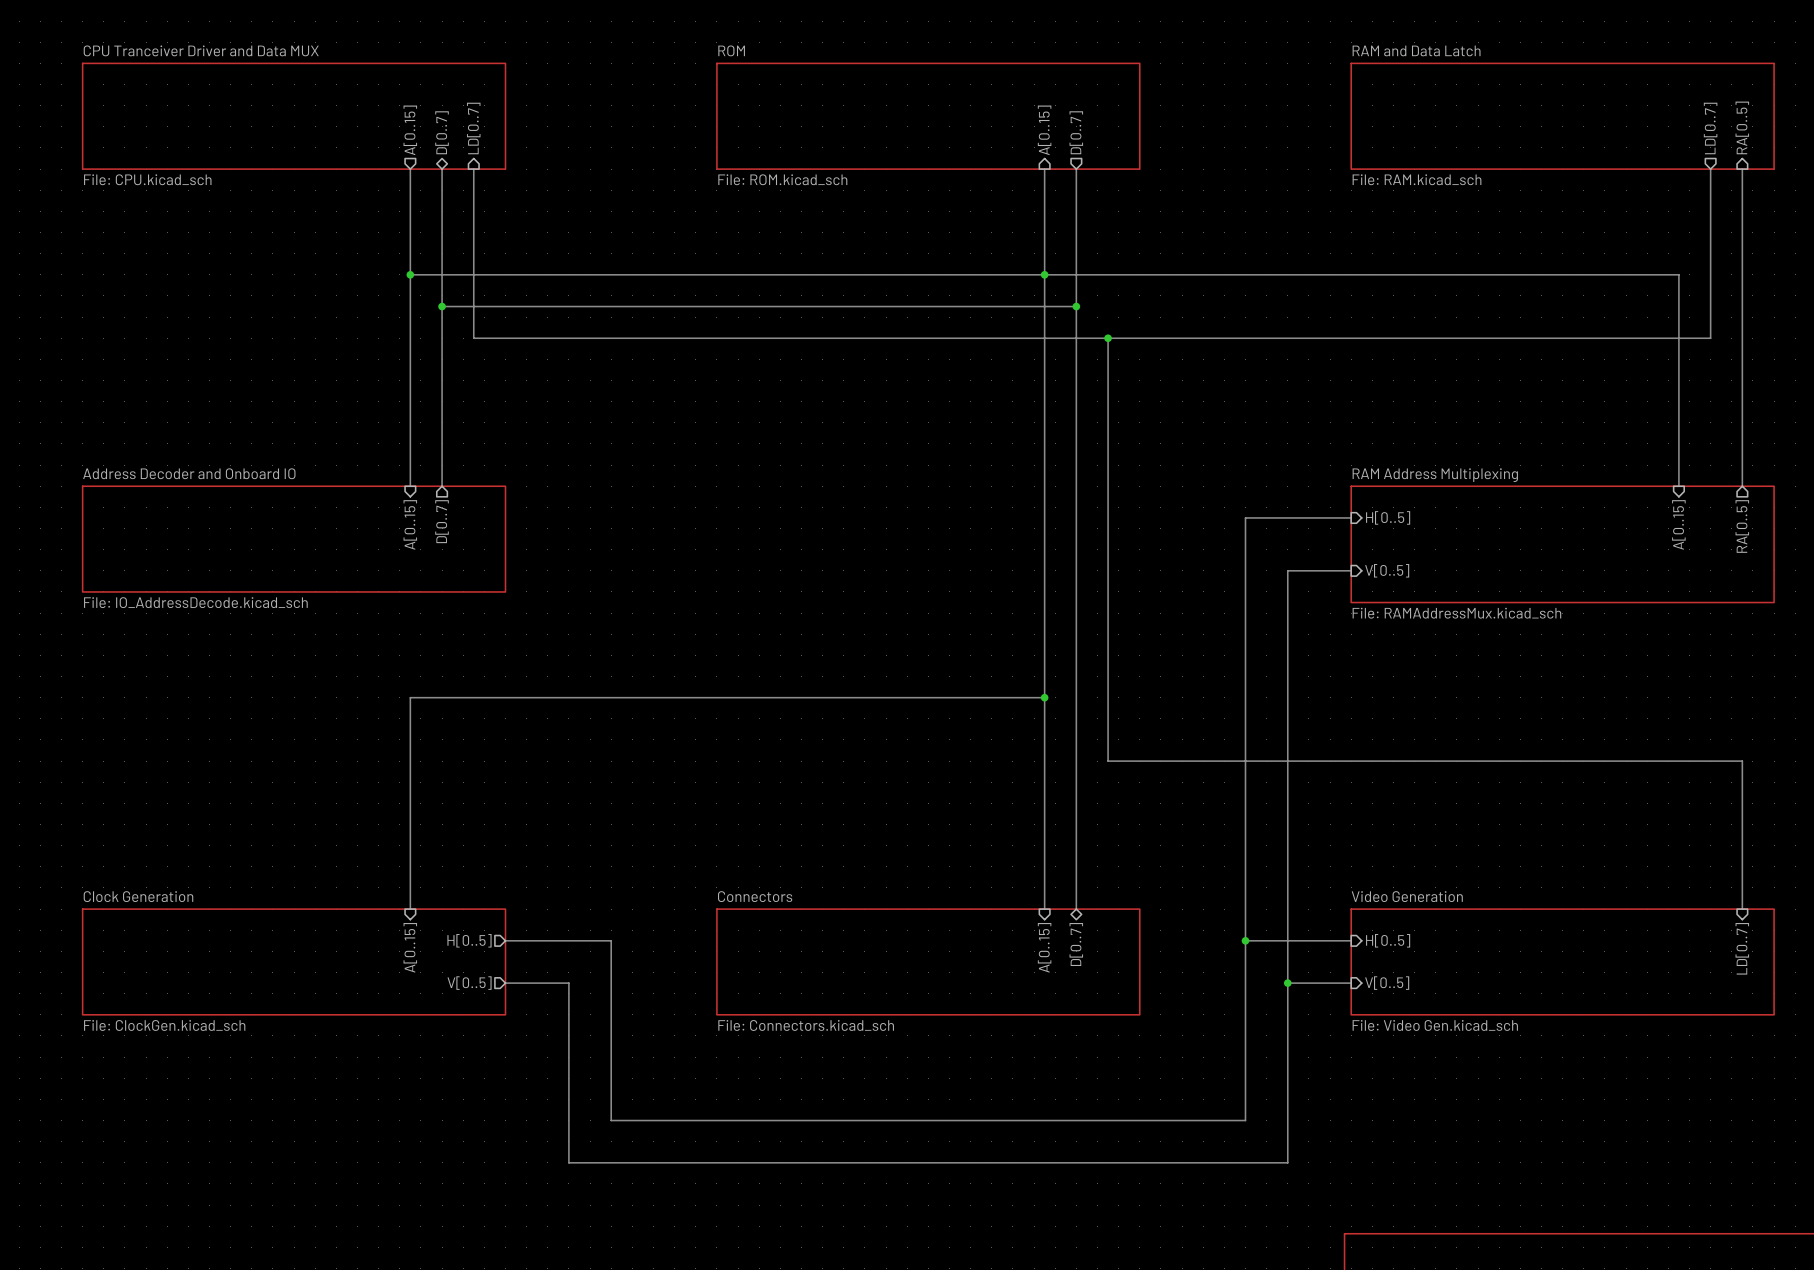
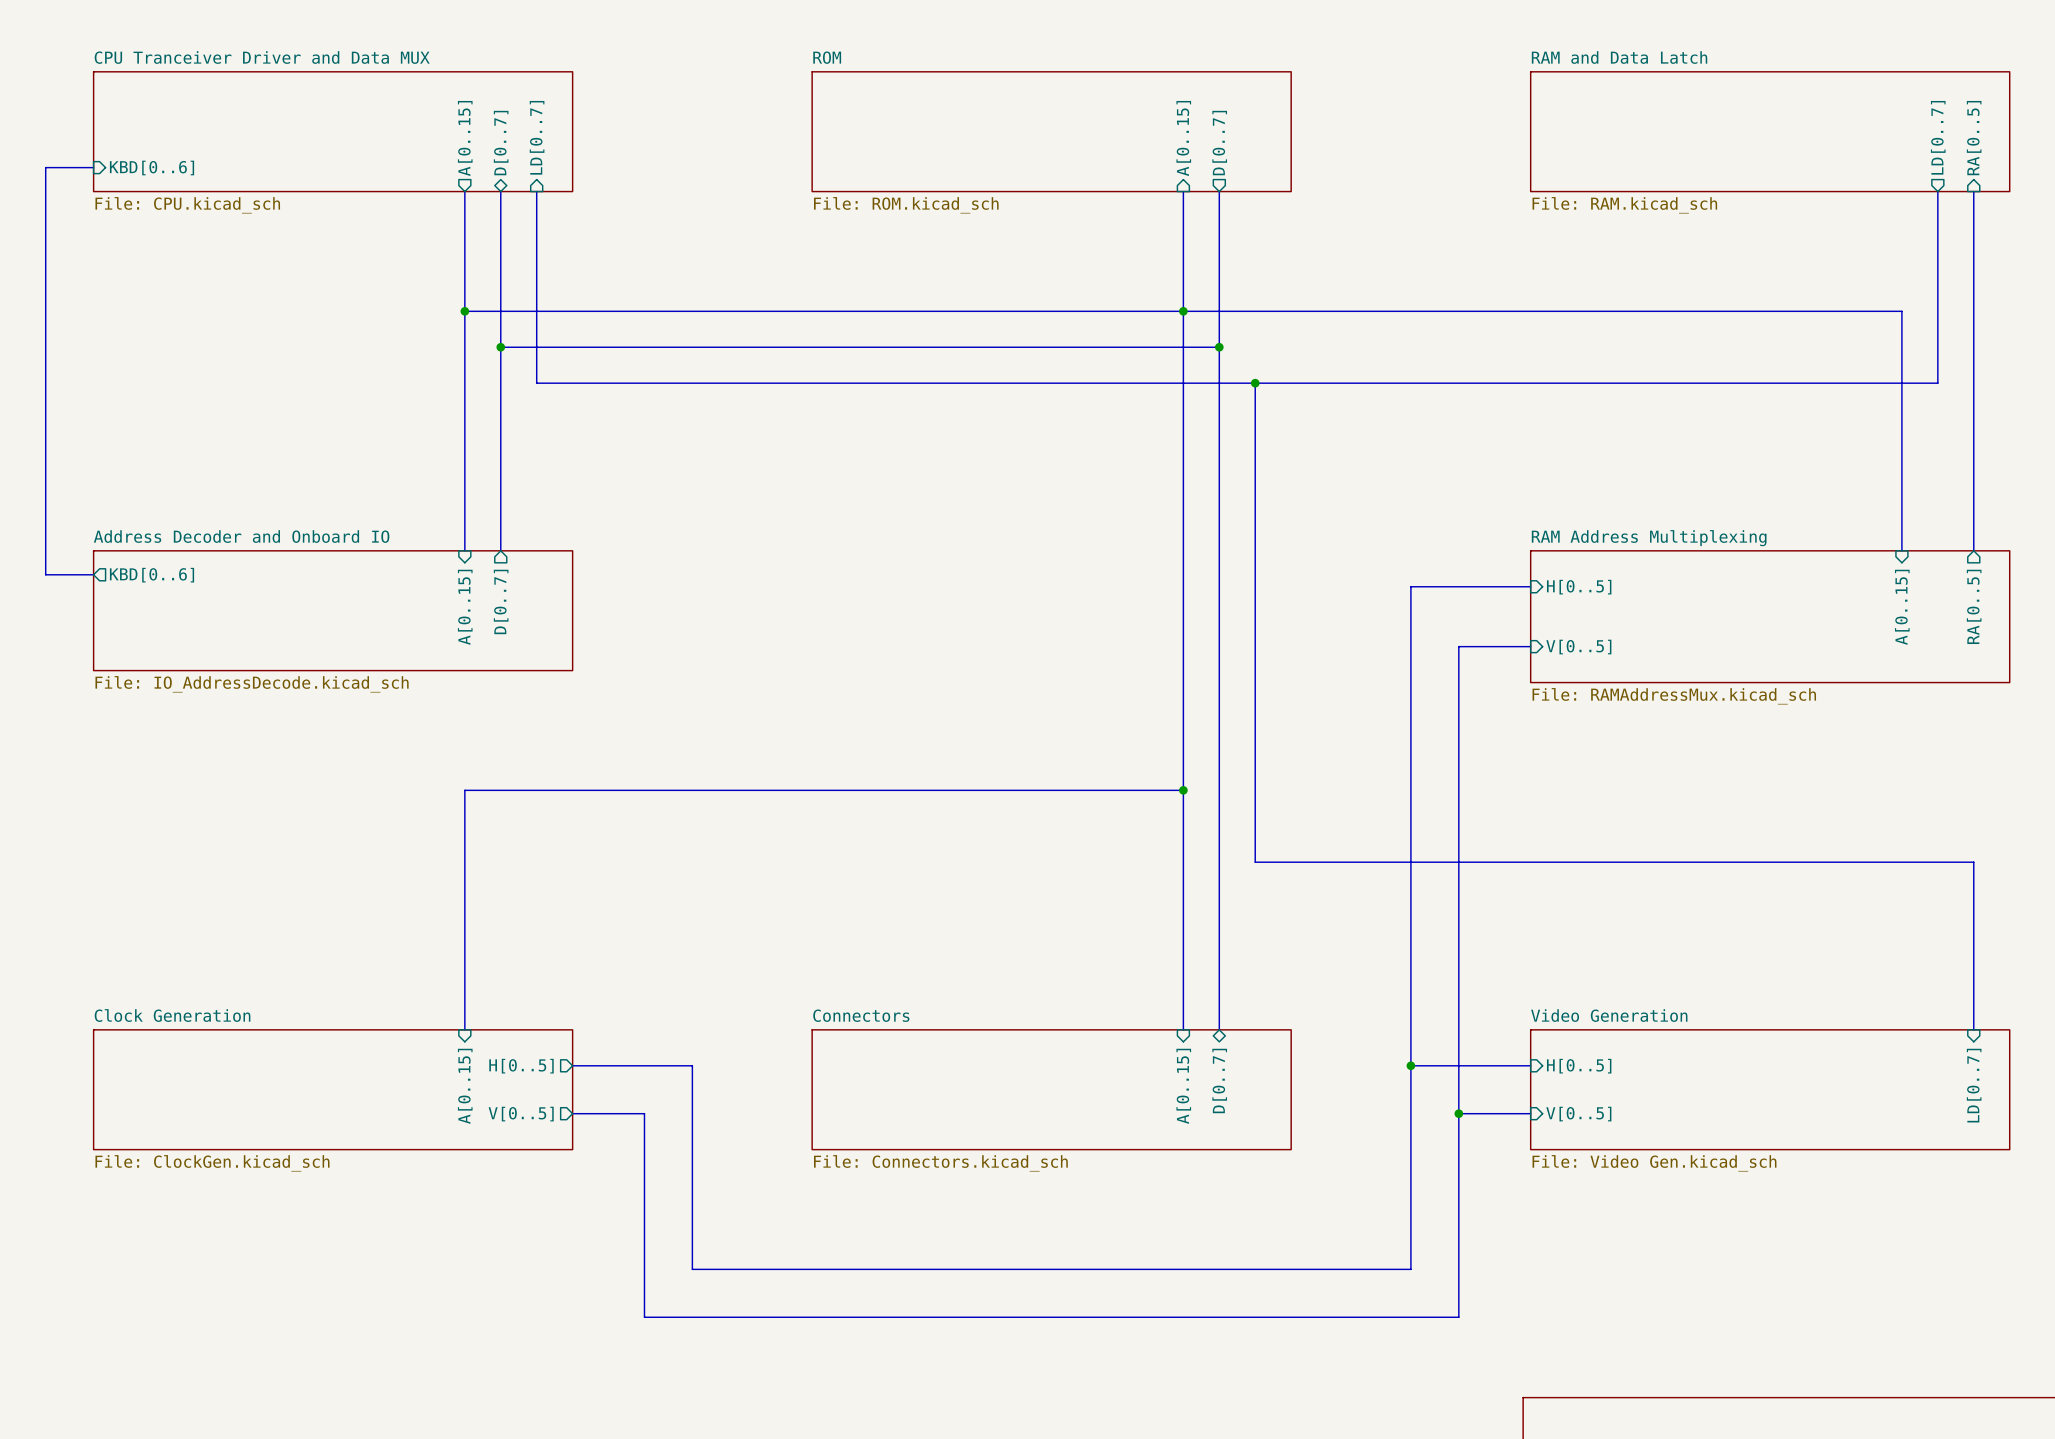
bus: none -> (93, 167) (45, 167) (45, 574) (93, 574)
sheet pin: none -> KBD[0..6] (152, 168)
sheet pin: none -> KBD[0..6] (152, 575)

